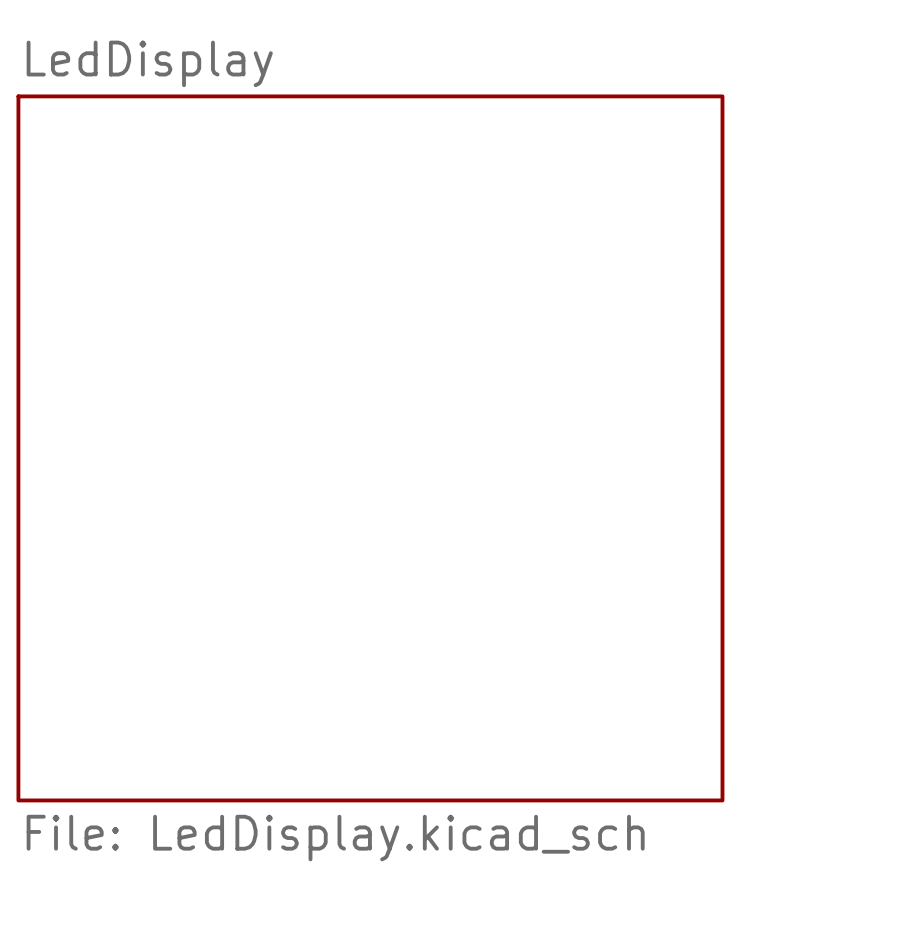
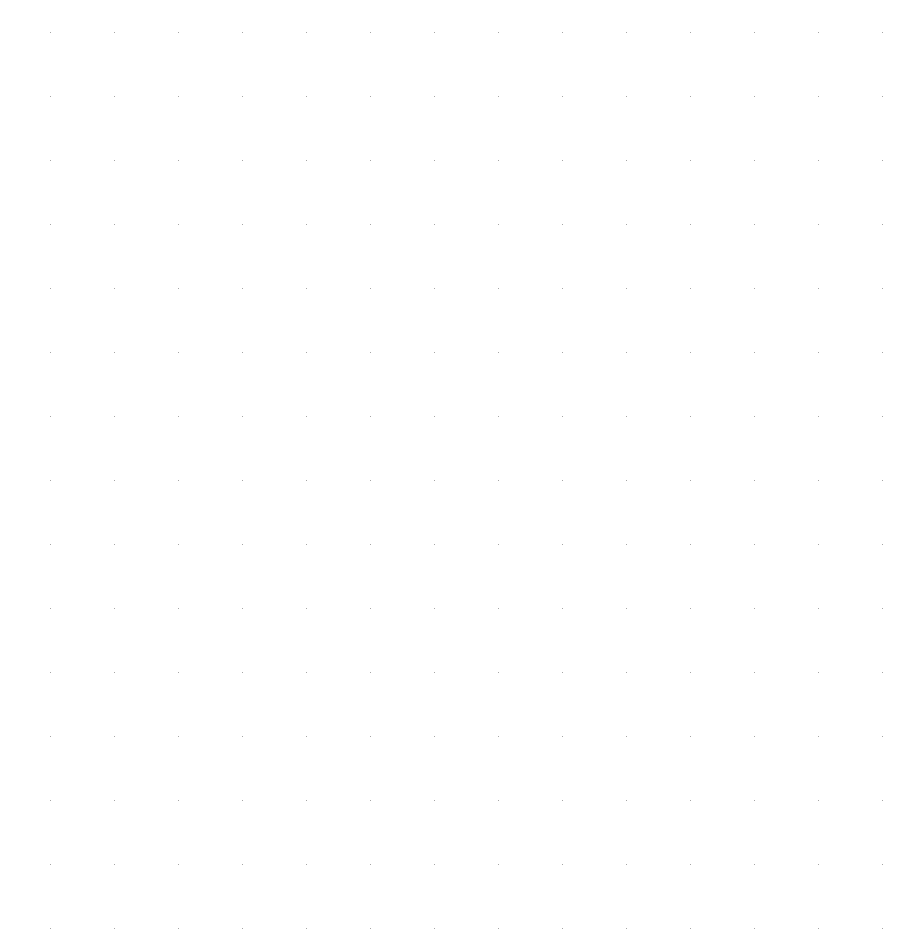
sheet LedDisplay: File: LedDisplay.kicad_sch (370, 448) -> none

